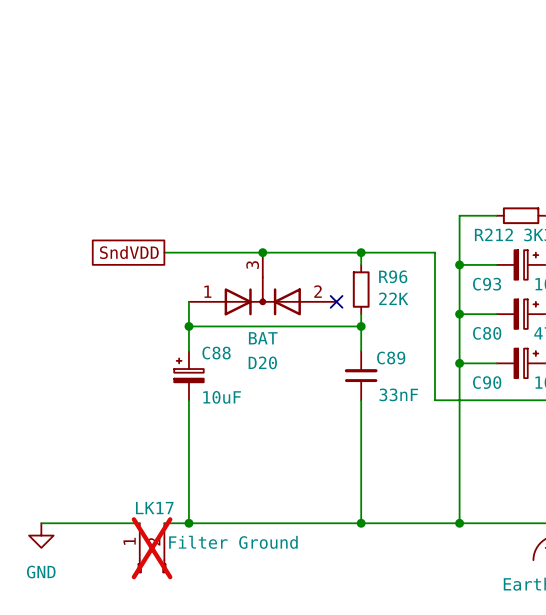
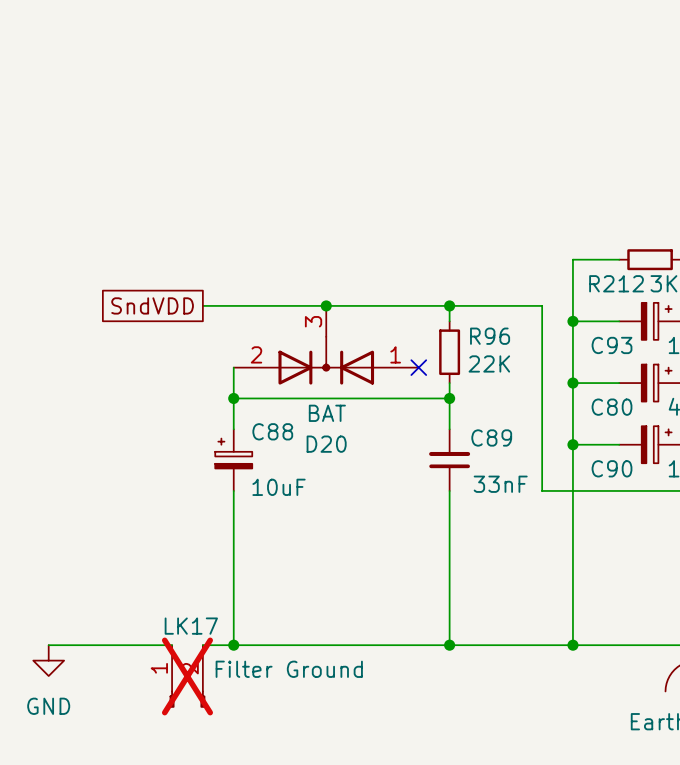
D20 flip: as is (262, 296) -> left-right (326, 360)

